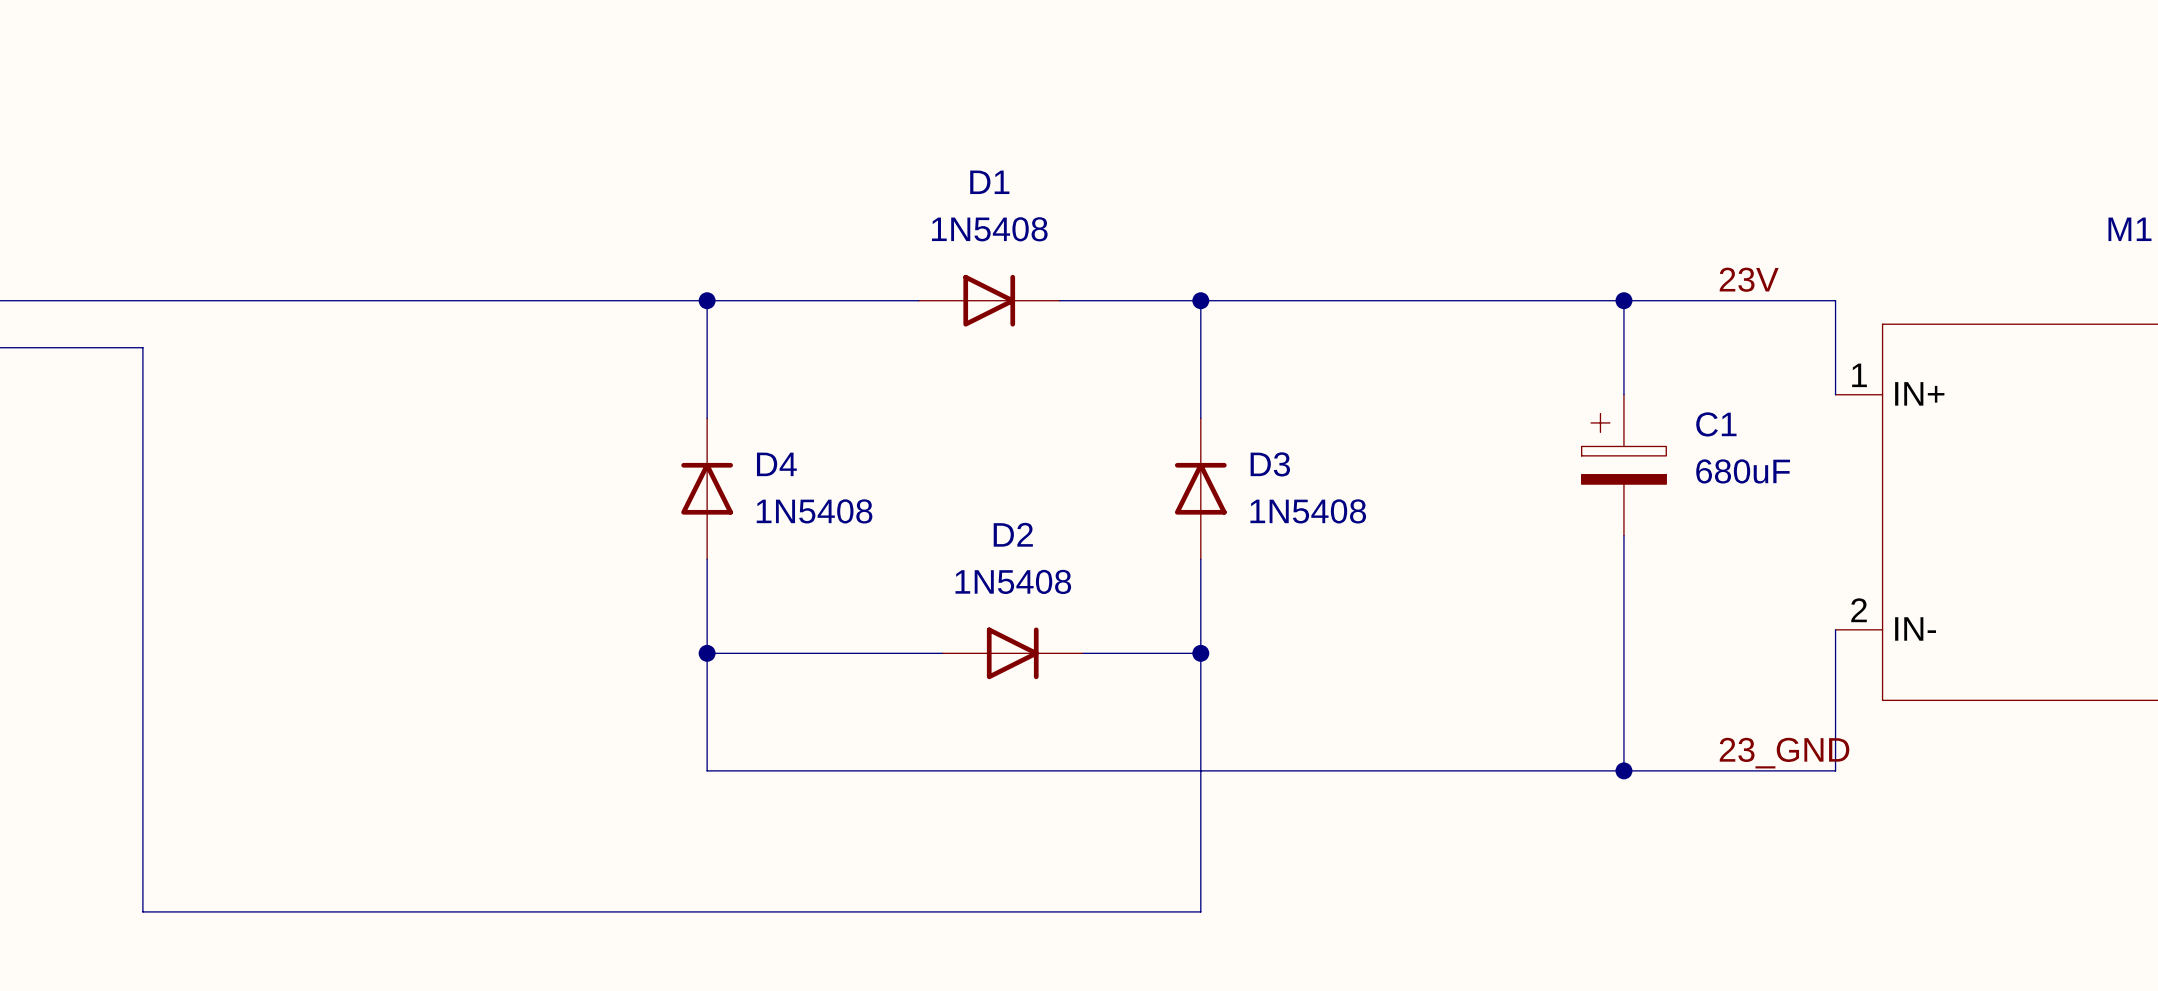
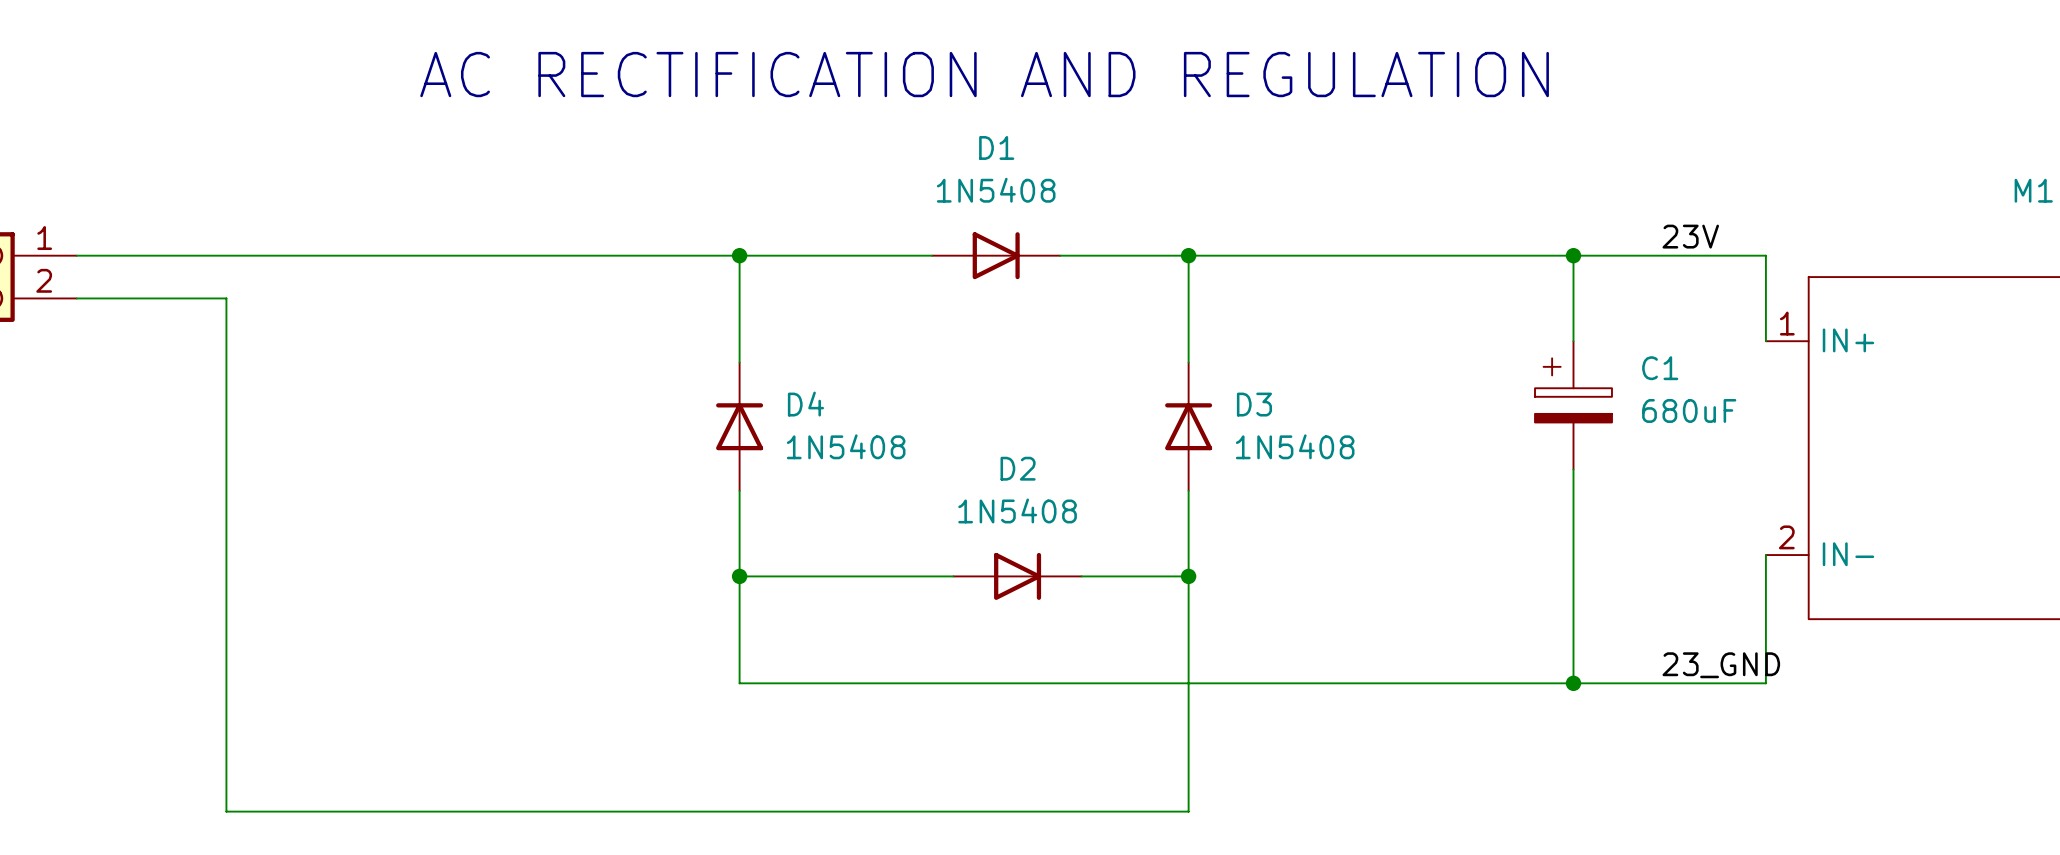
text: none -> AC RECTIFICATION AND REGULATION (984, 74)

